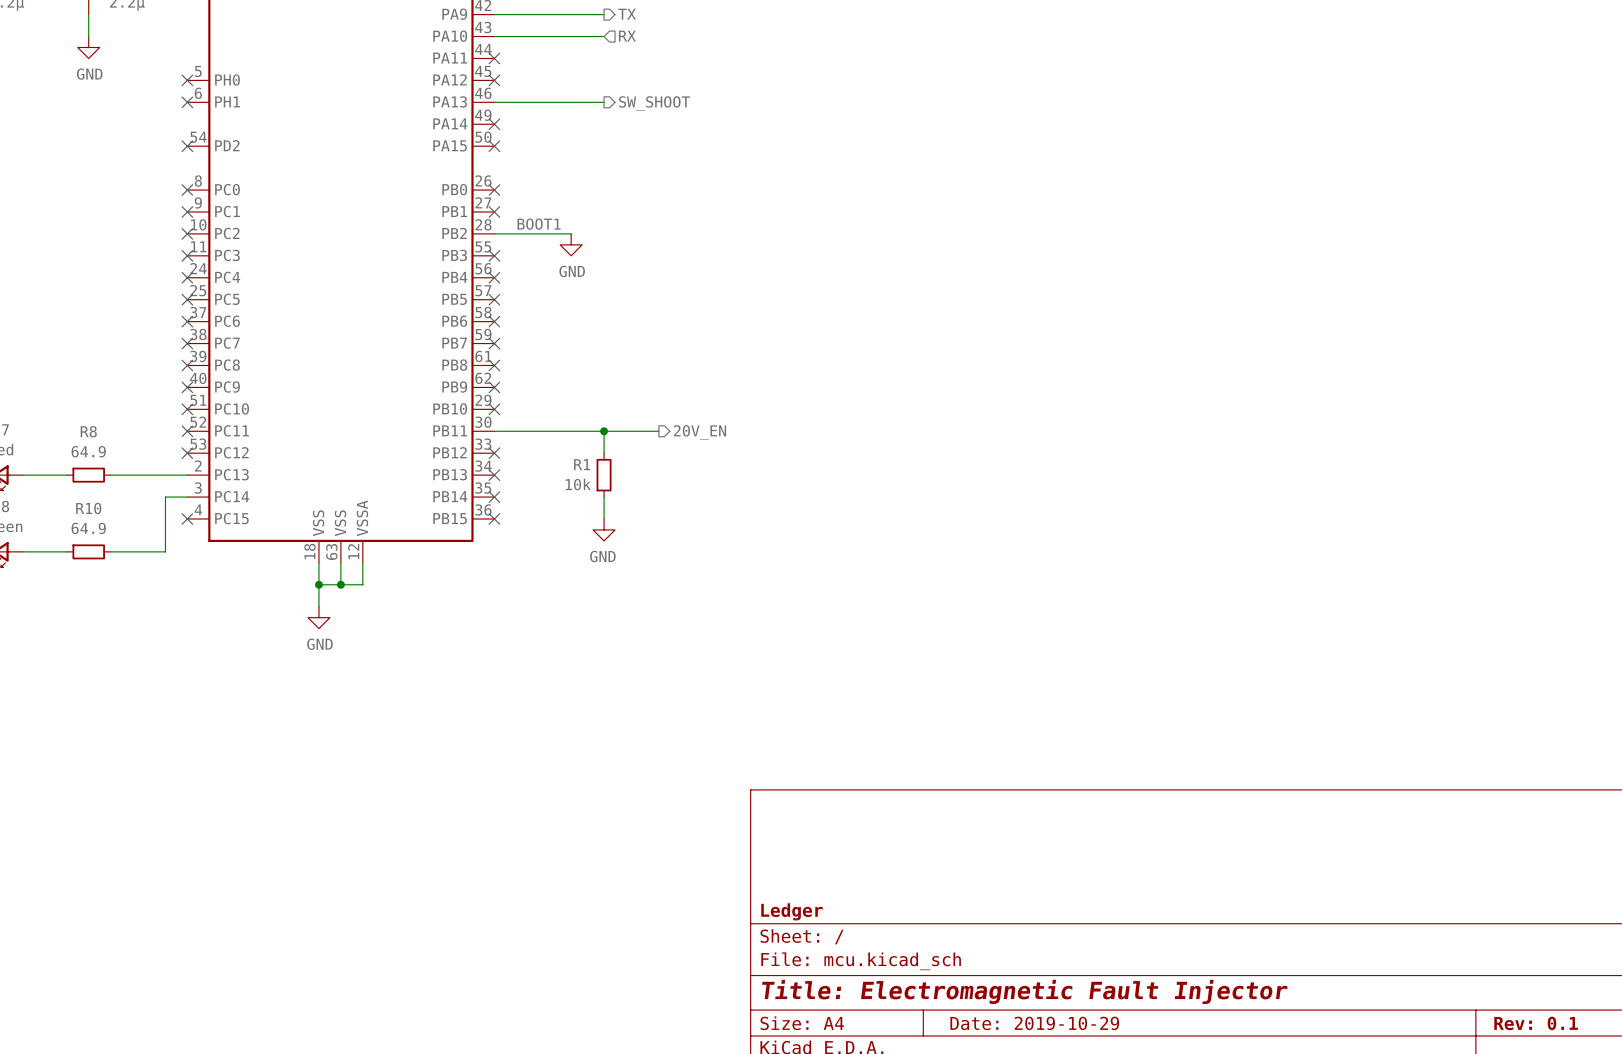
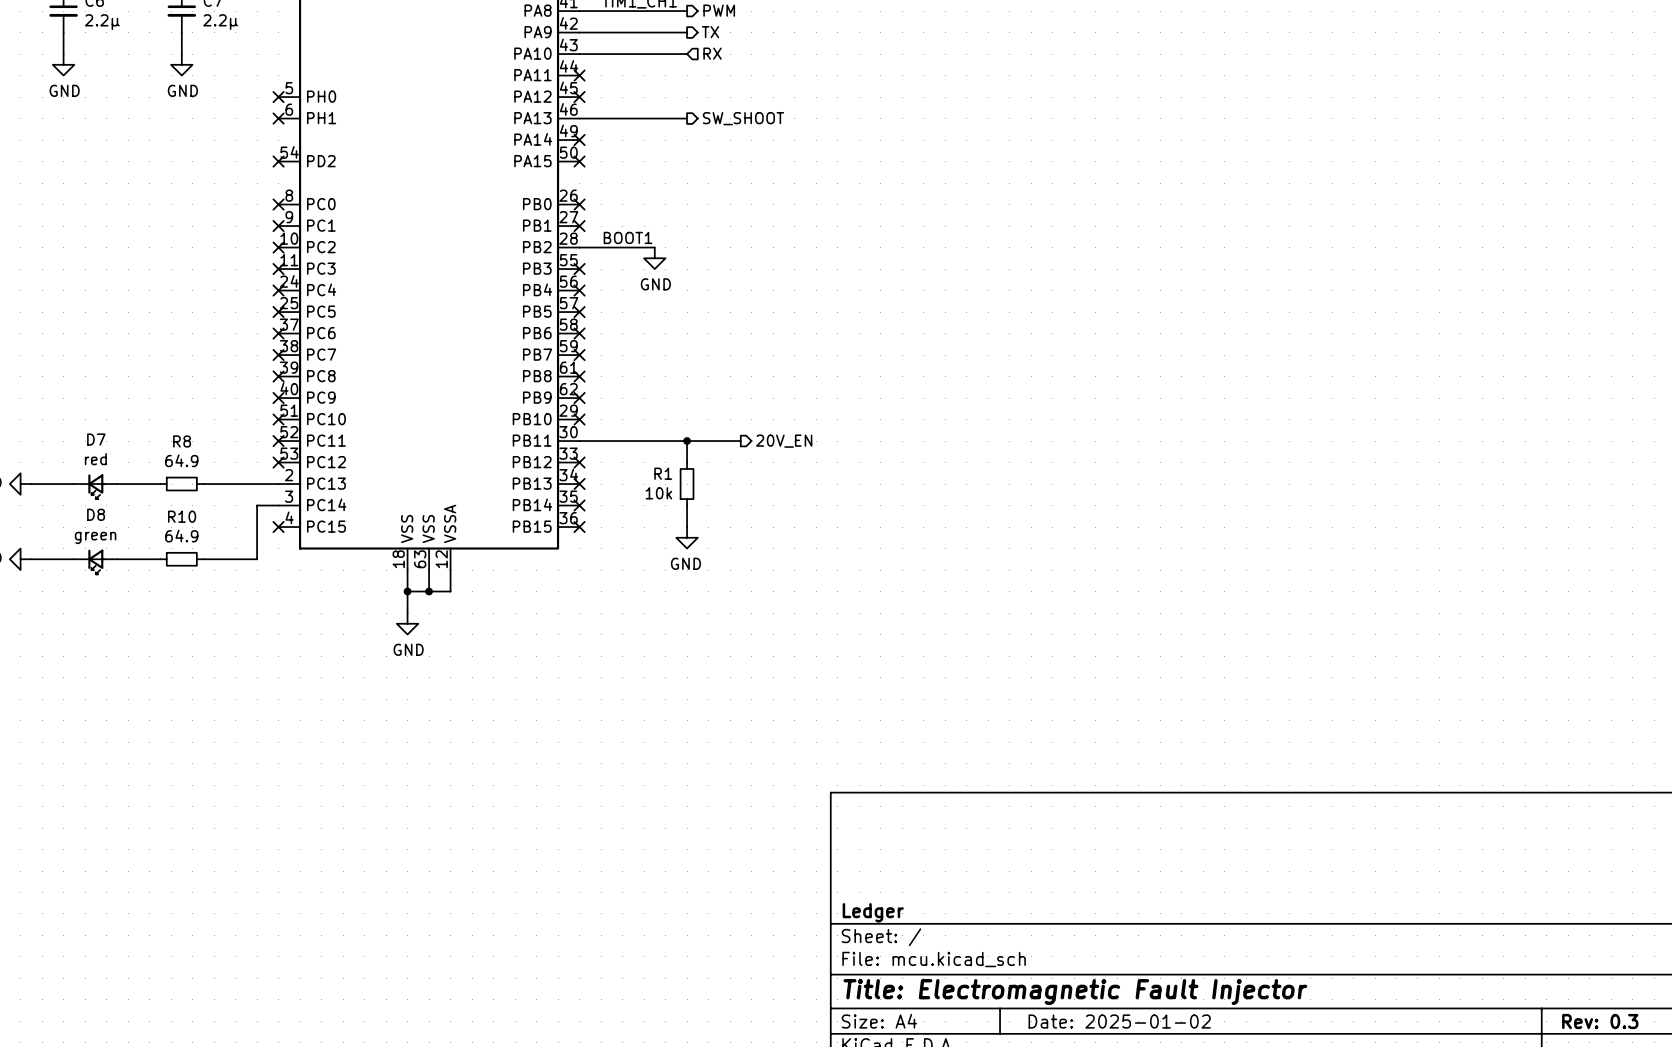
title block: Date: 2019-10-29 (1034, 1023) -> Date: 2025-01-02 (1119, 1021)
title block: Rev: 0.1 (1536, 1023) -> Rev: 0.3 (1600, 1021)

